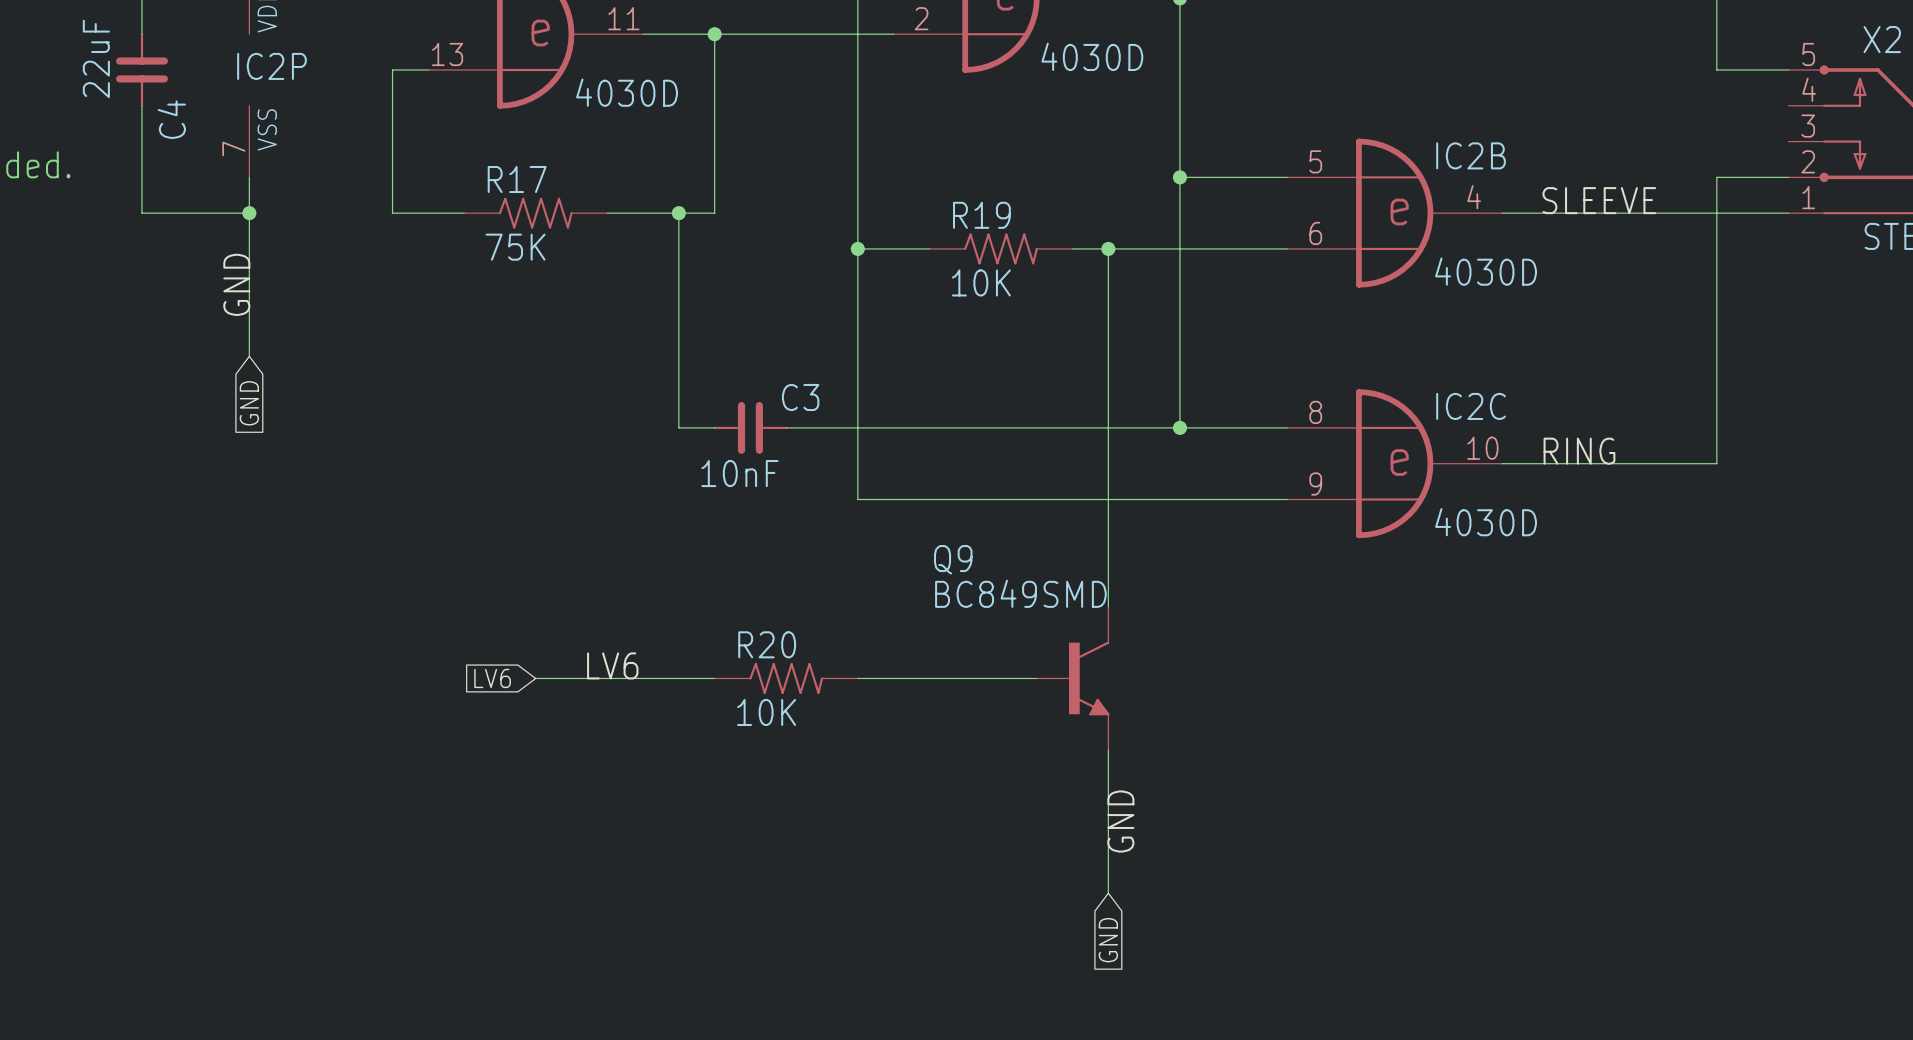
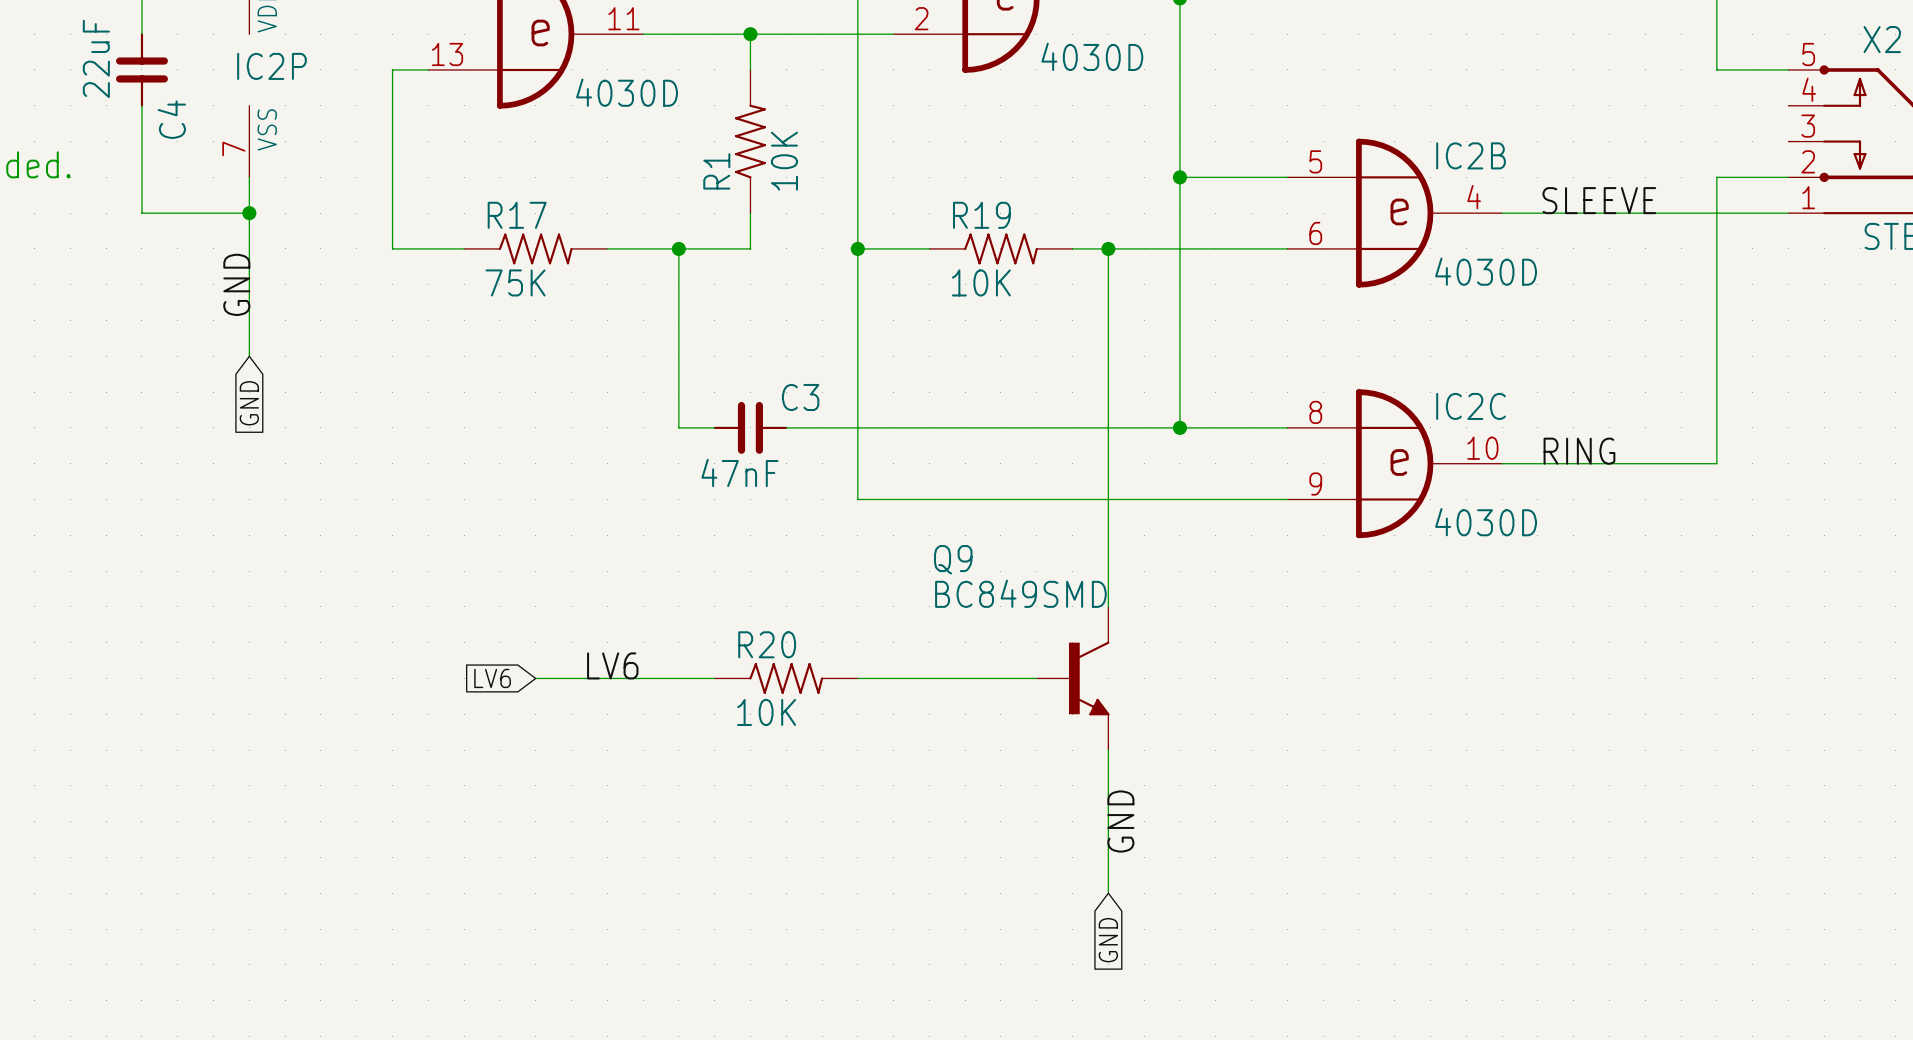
wire: (714, 34) (714, 213) (607, 213) -> none
junction position: (714, 34) -> (750, 34)
R1: none -> 10K (750, 141)
wire: (392, 213) (464, 213) -> (392, 213) (392, 248) (464, 248)
R17 position: (535, 213) -> (535, 248)
wire: (678, 213) (678, 248) -> (750, 34) (750, 69)
junction position: (678, 213) -> (678, 248)
wire: none -> (750, 213) (750, 248) (607, 248)
C3 value: 10nF (739, 473) -> 47nF (739, 472)

